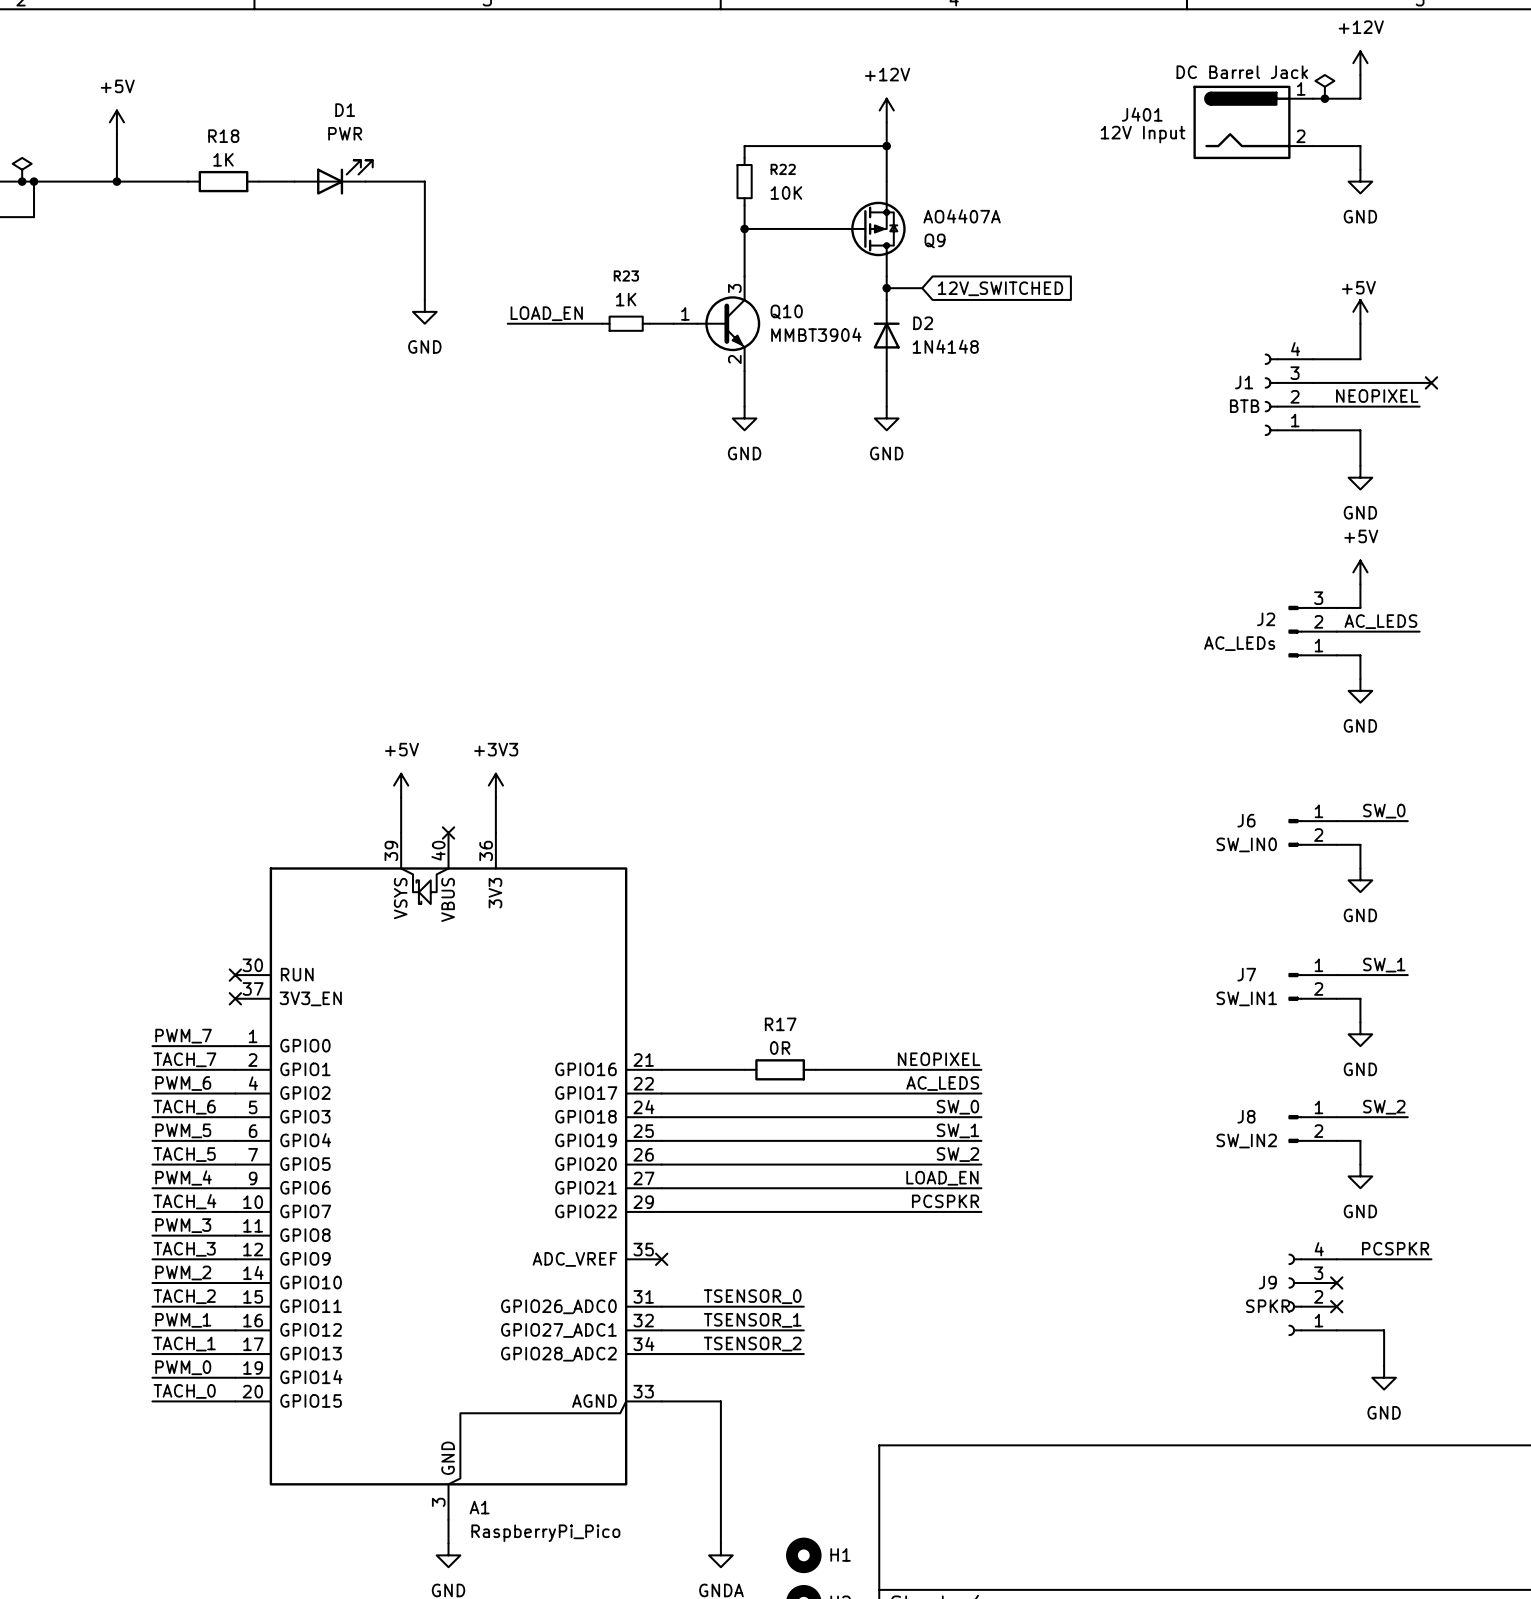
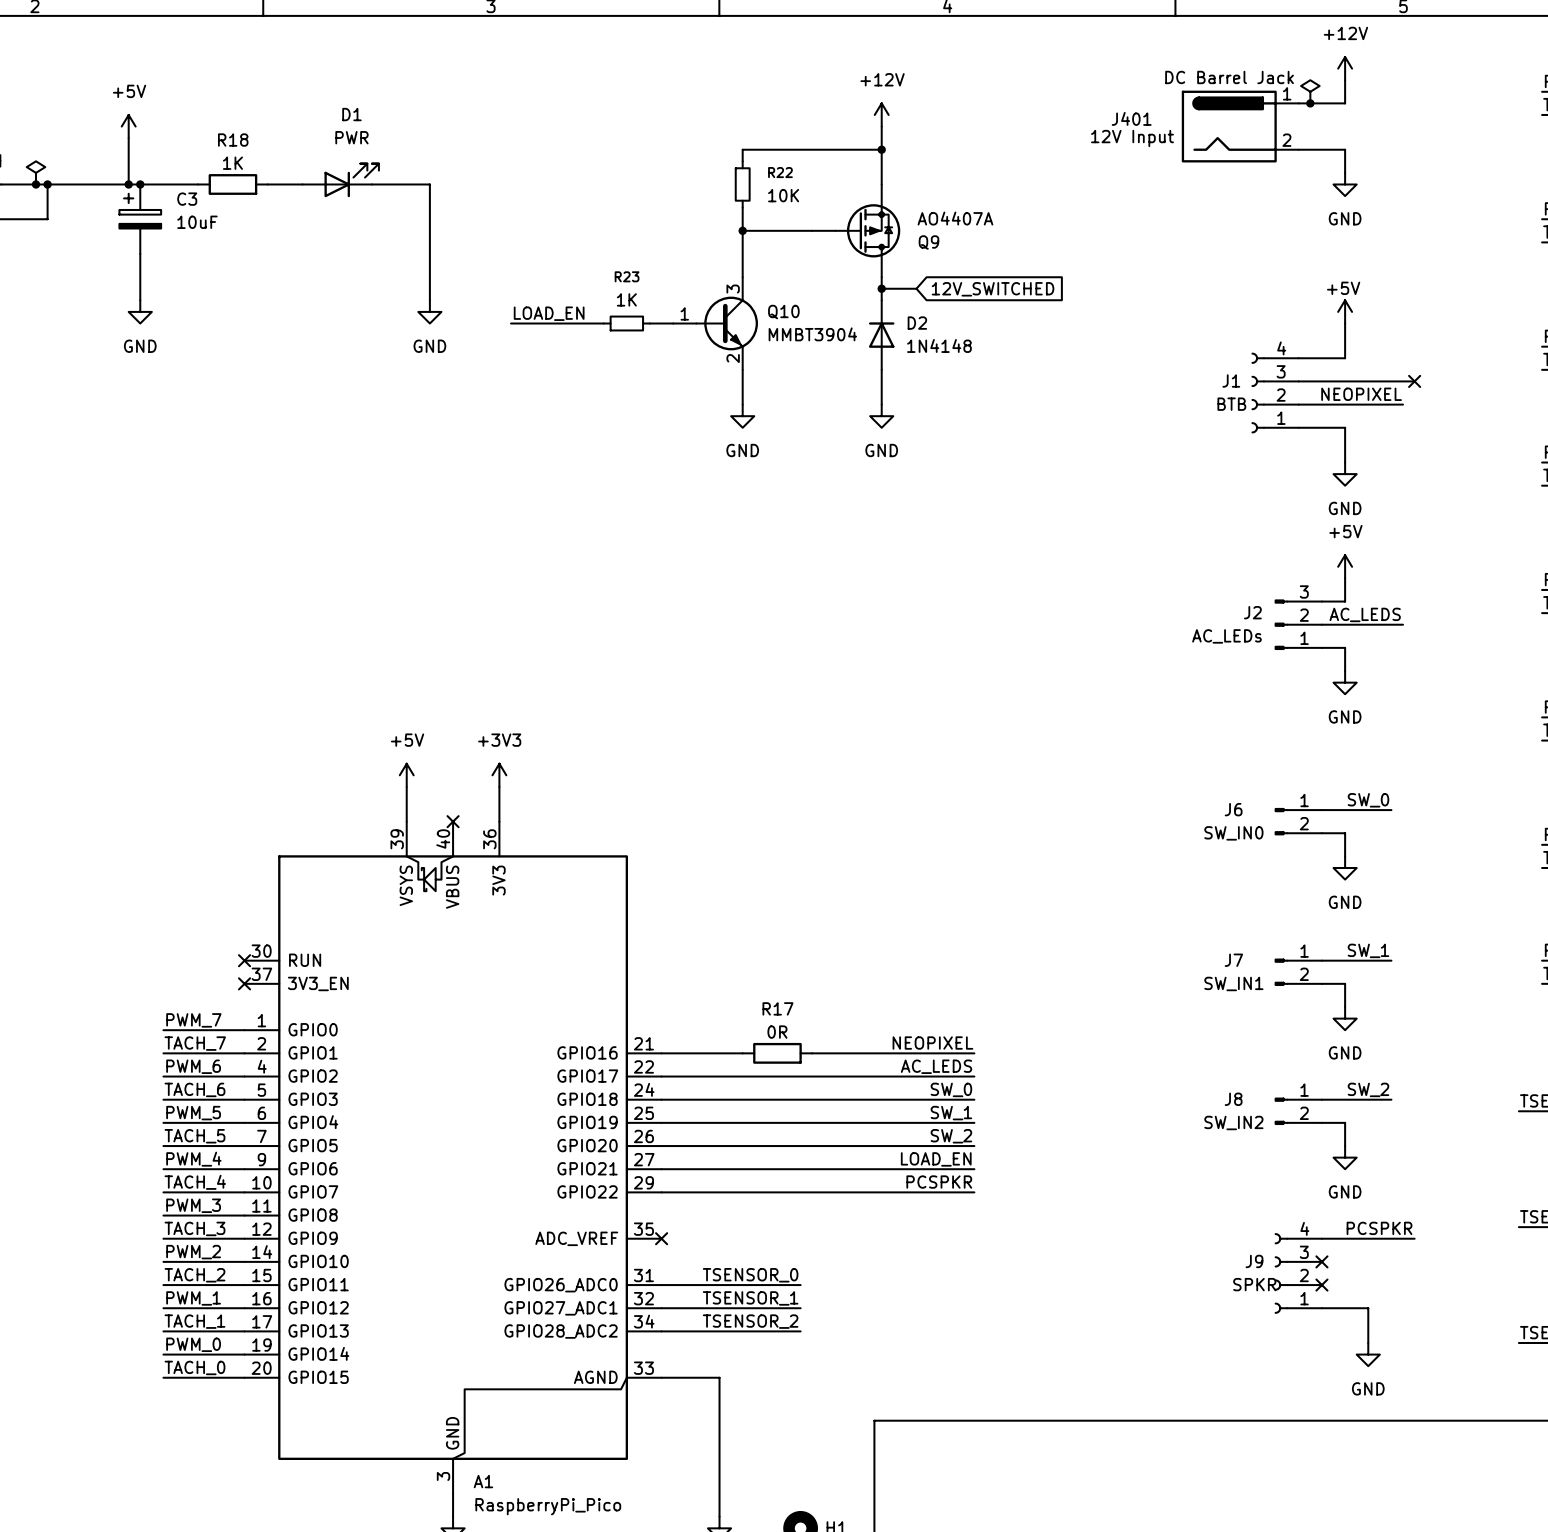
junction: none -> (140, 184)
C3: none -> 10uF (140, 219)
wire: none -> (140, 253) (140, 300)
power symbol: none -> GND (140, 311)

